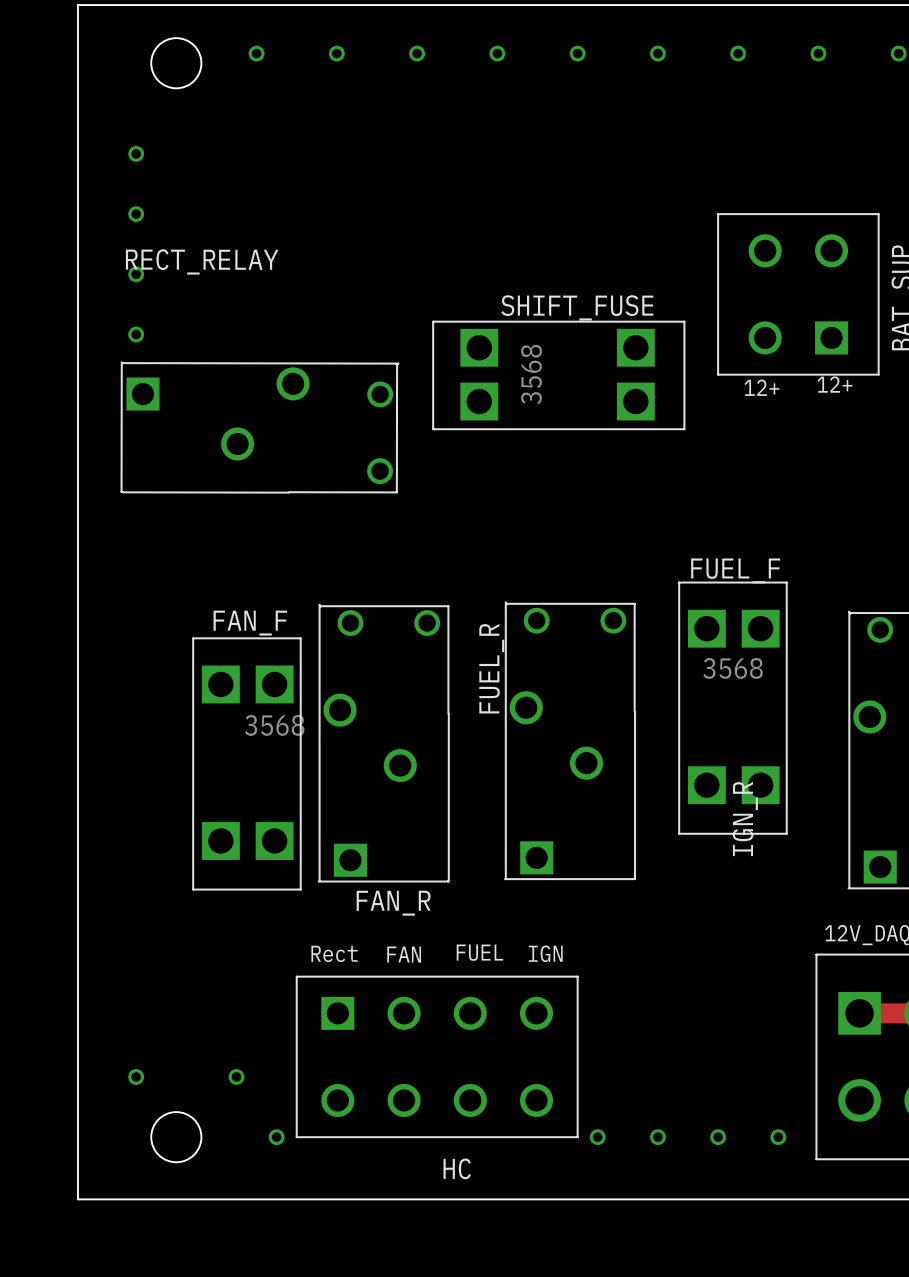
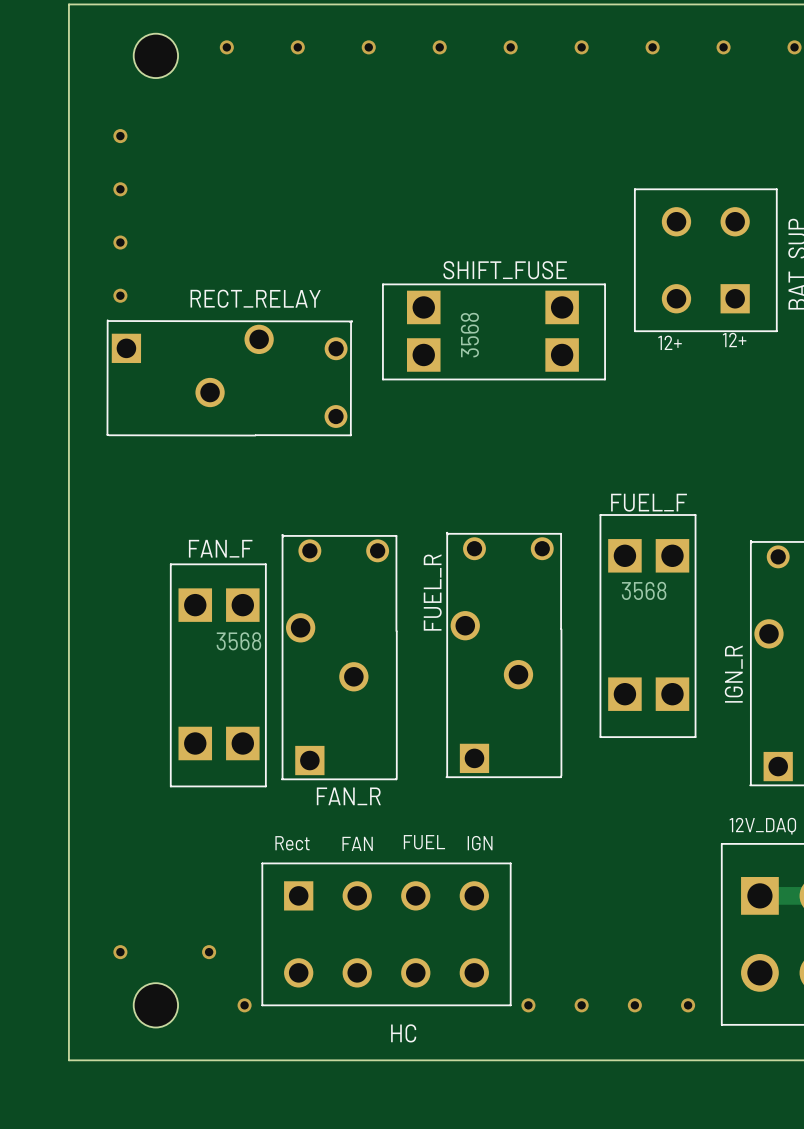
RECT_RELAY name position: RECT_RELAY (202, 261) -> RECT_RELAY (255, 298)
IGN_R name position: IGN_R (745, 819) -> IGN_R (733, 674)

